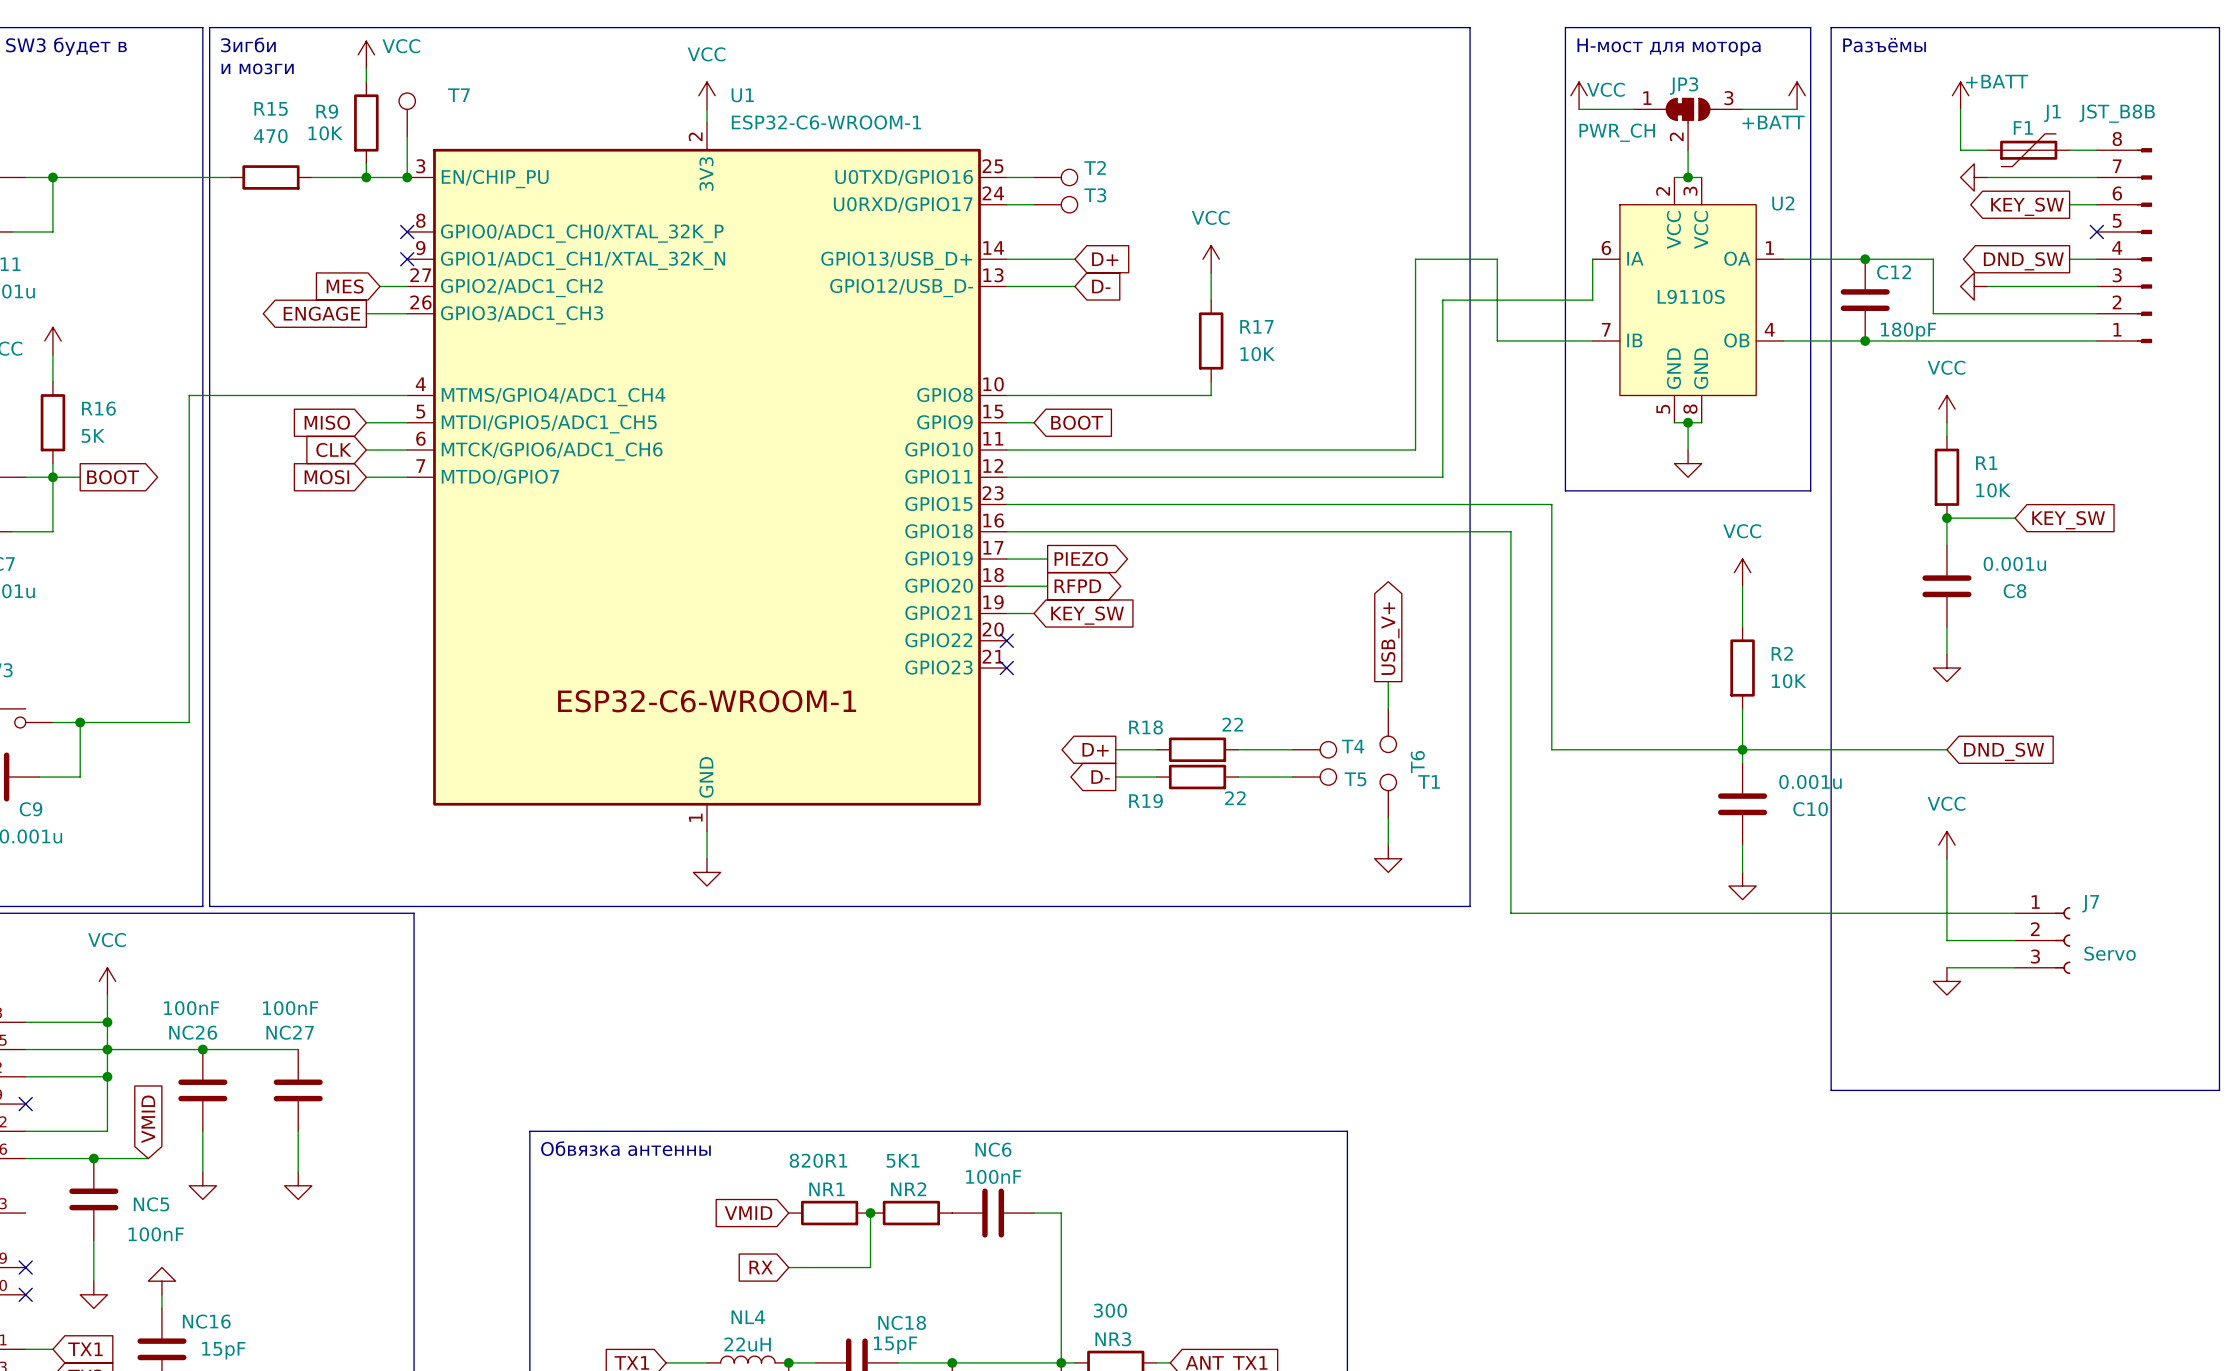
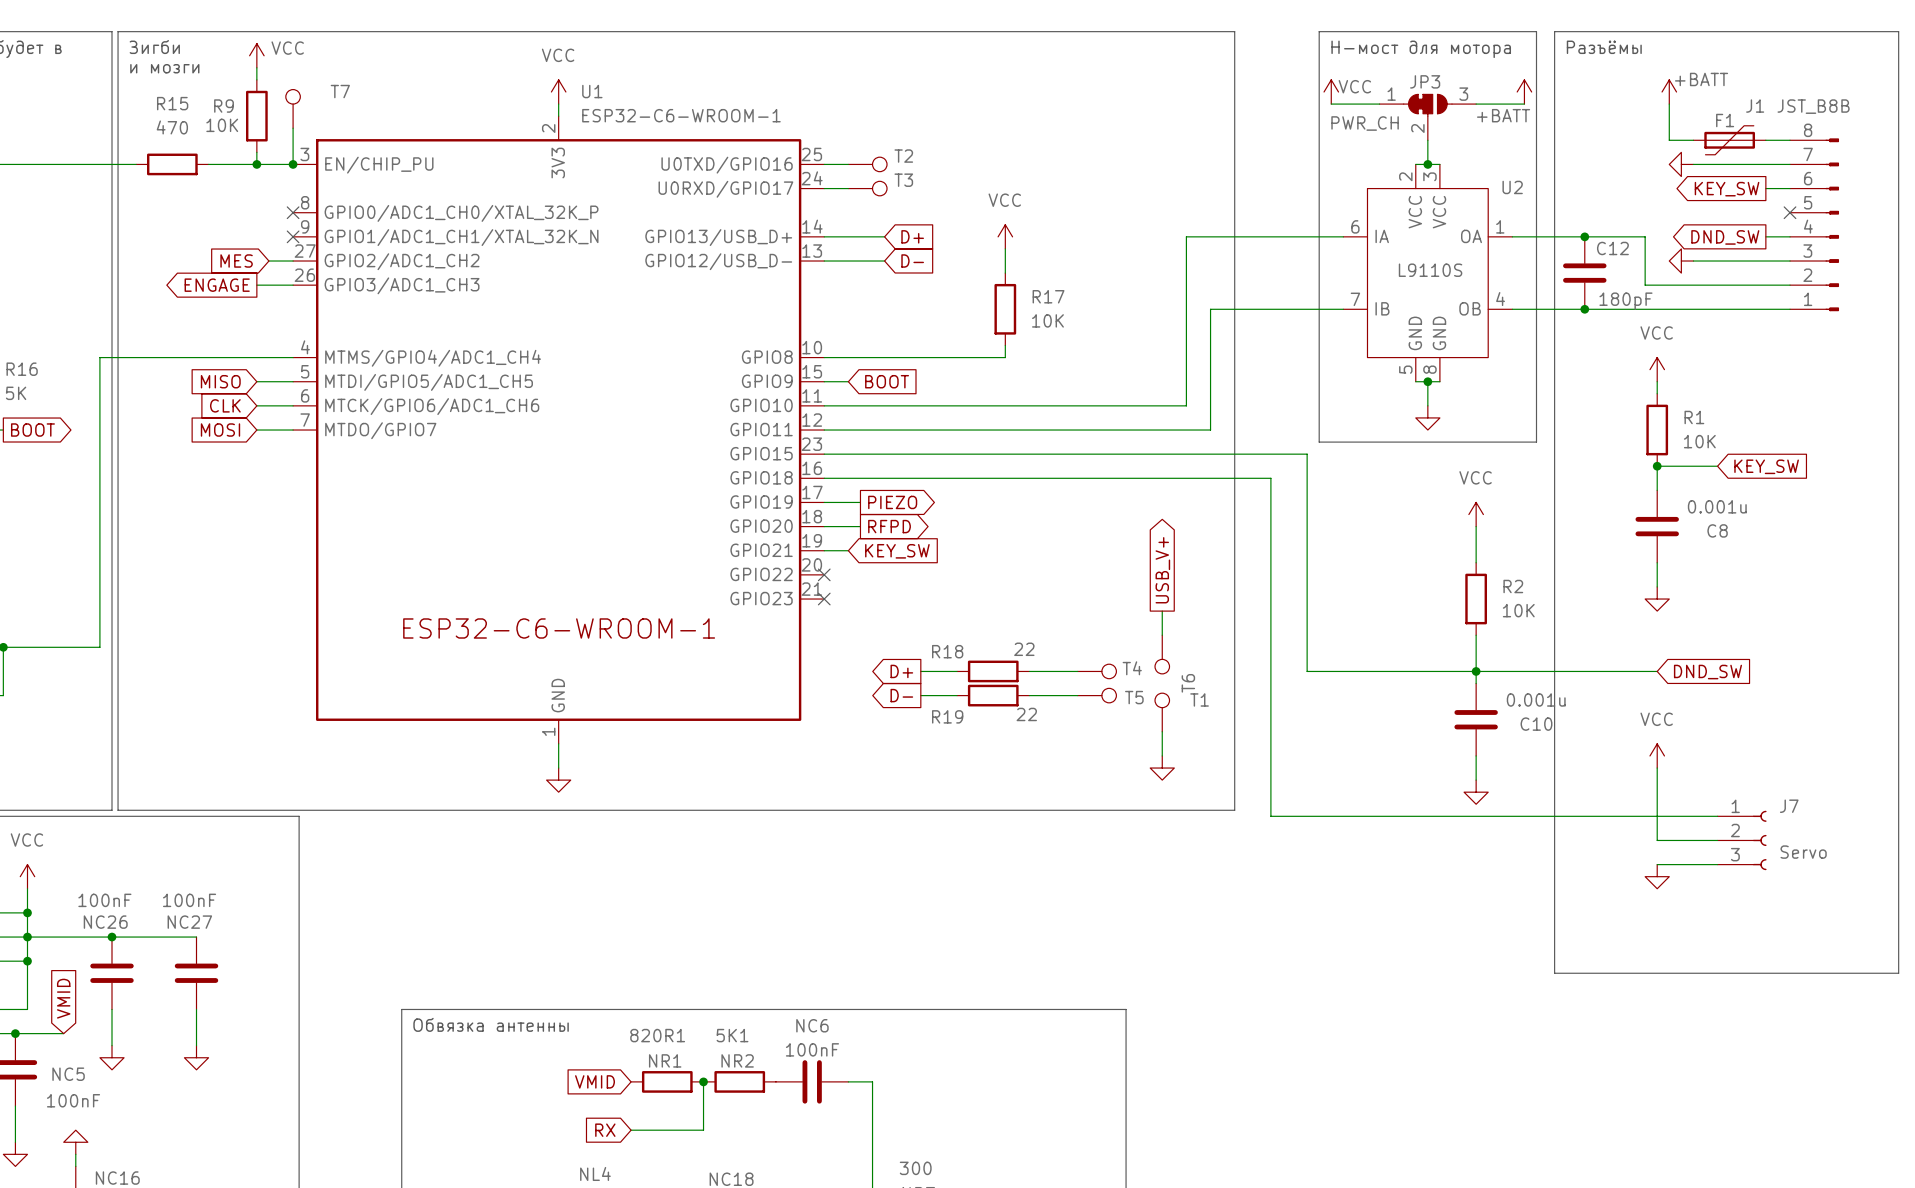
wire: (1497, 259) (1497, 340) -> (1210, 309) (1258, 309)
wire: (1592, 259) (1592, 300) (1442, 300) (1442, 340) -> (1343, 236) (1258, 236)

